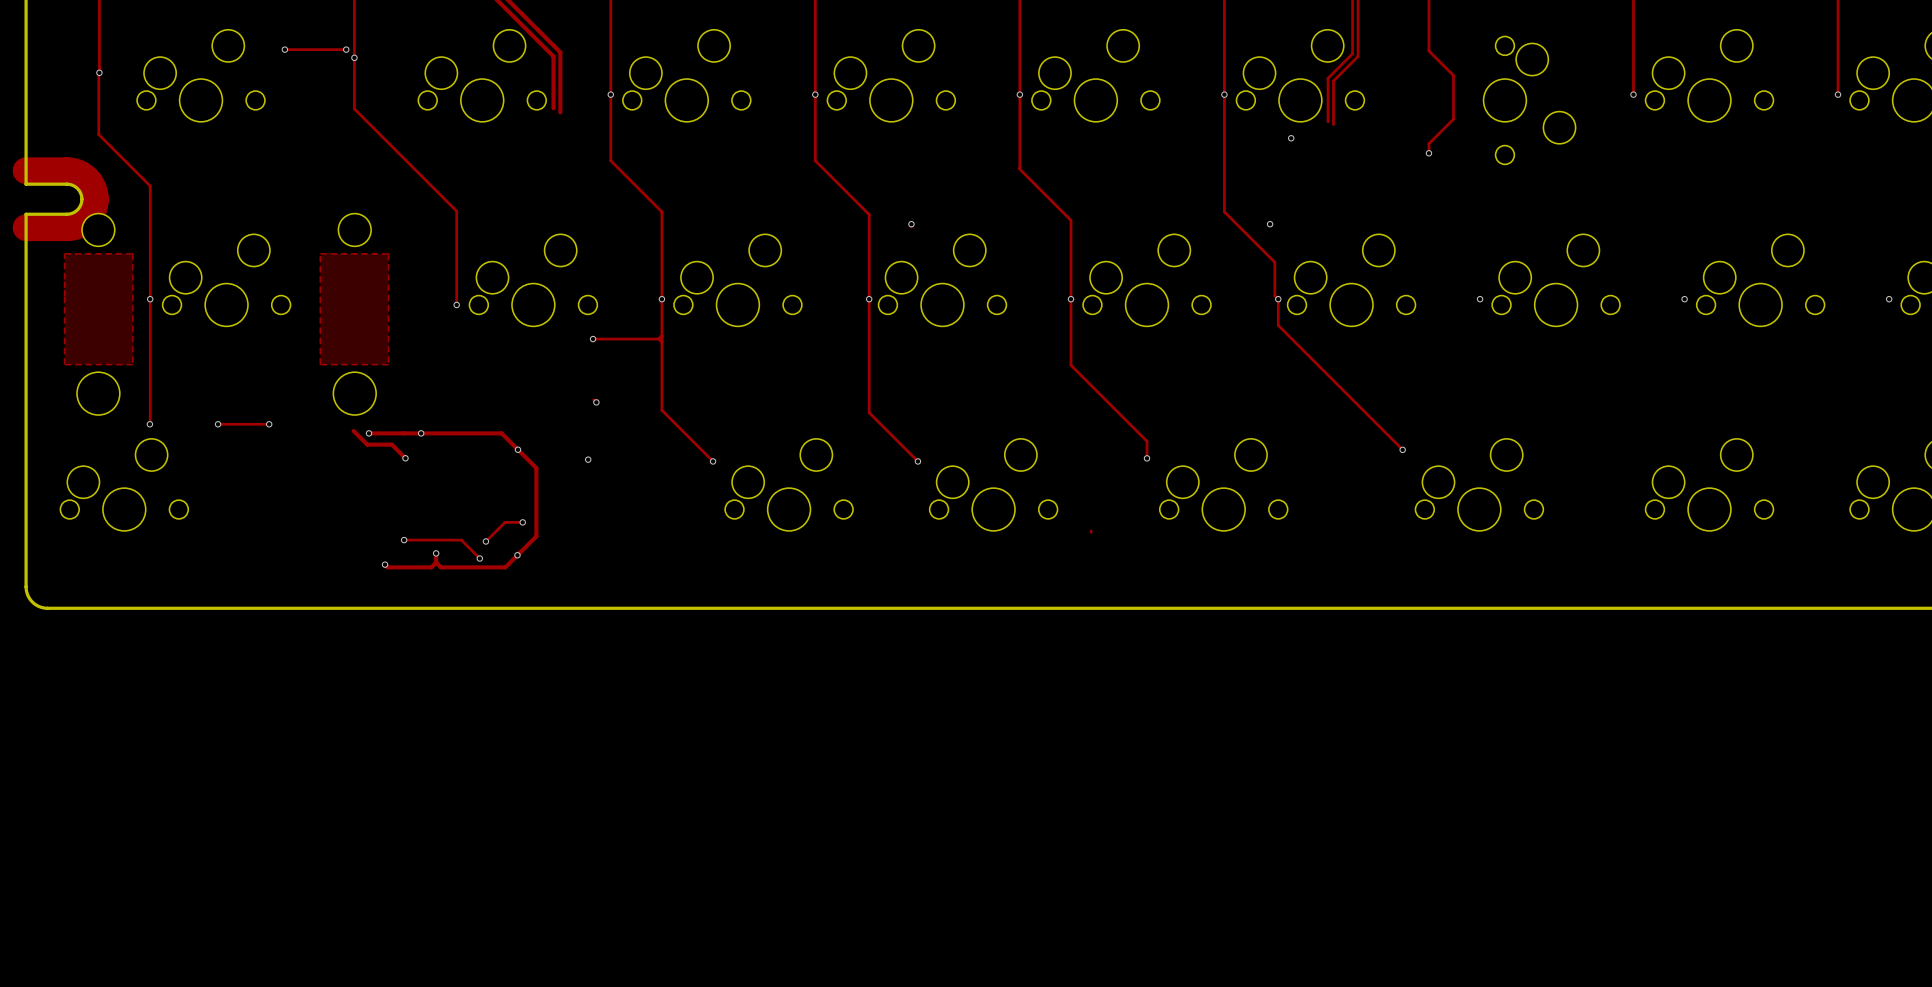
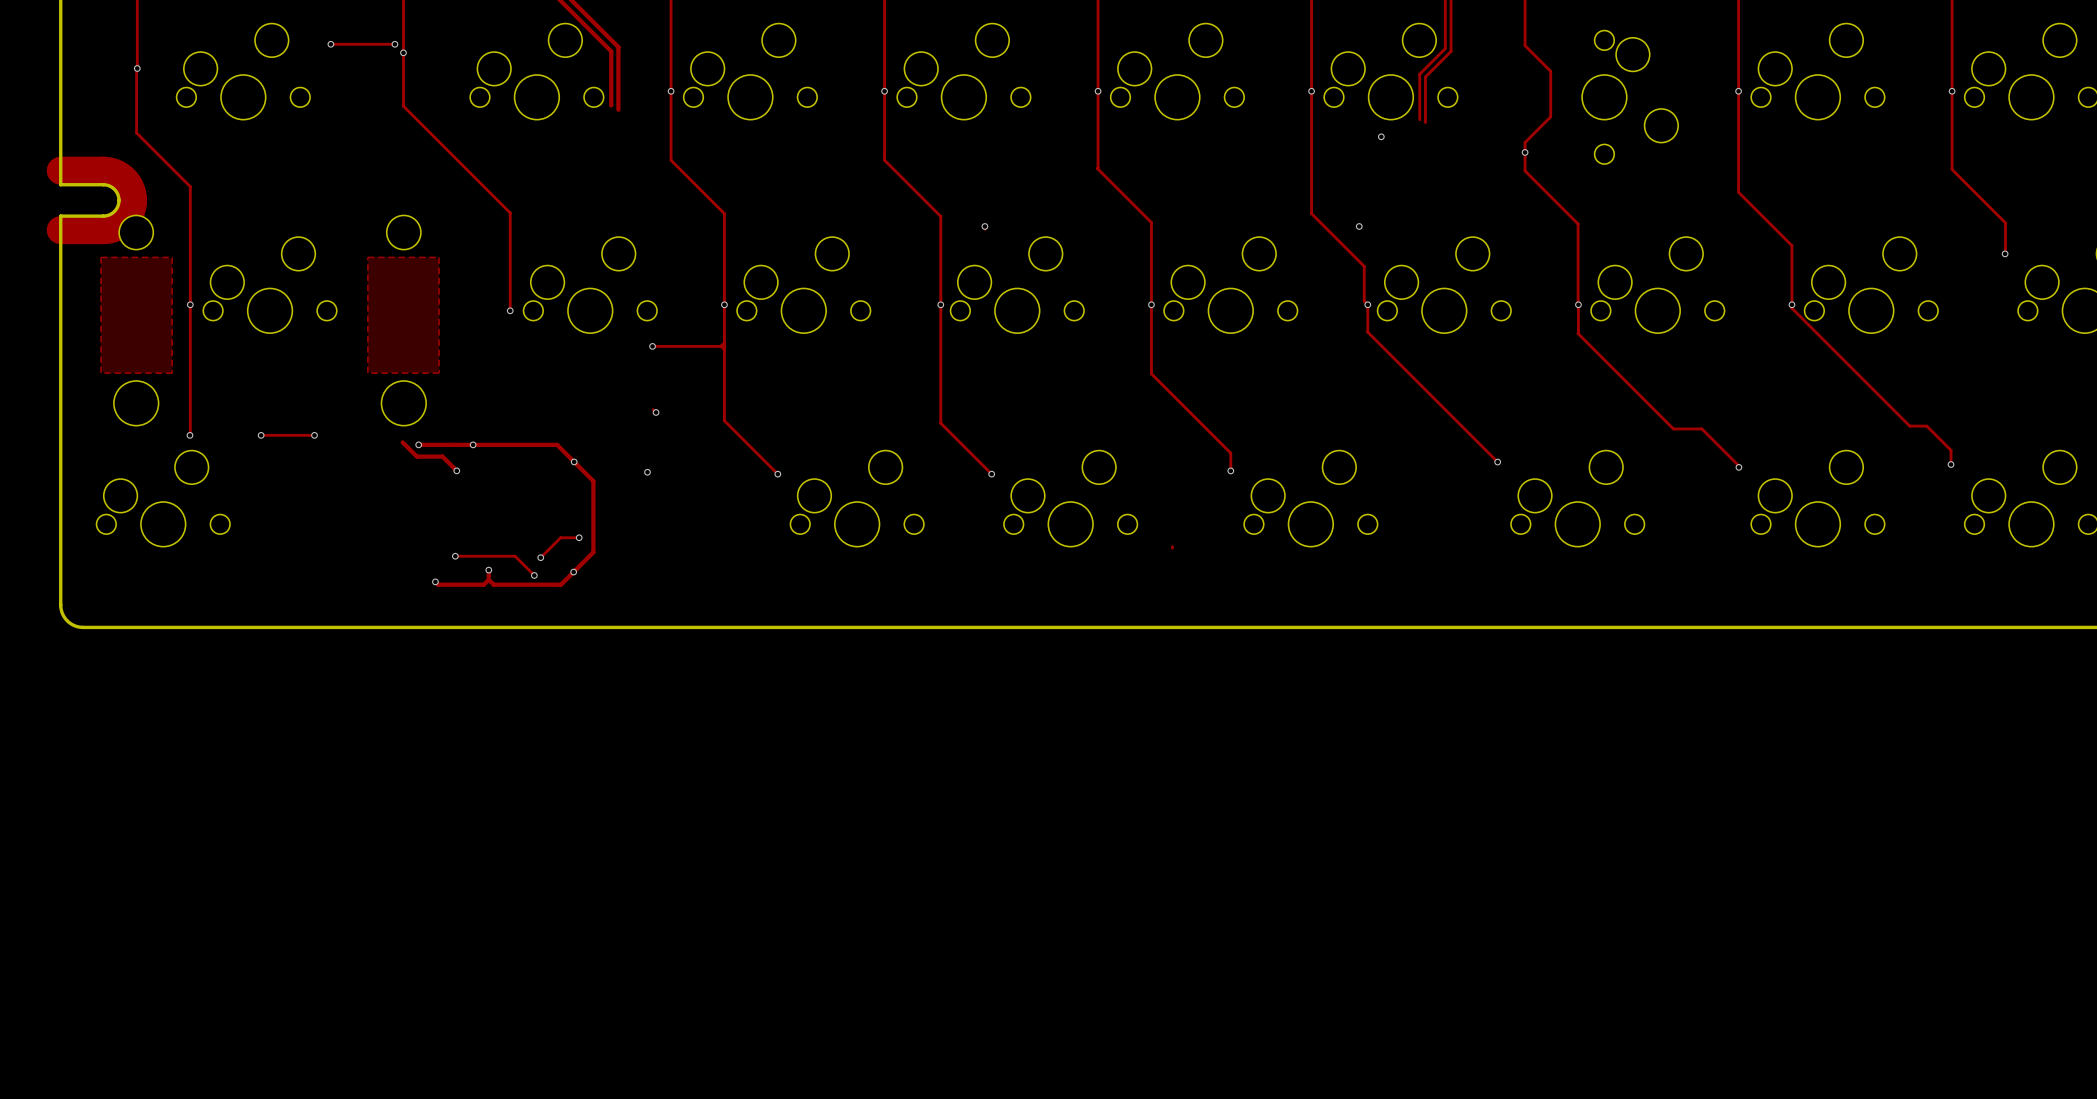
track: none -> (1738, 91) (1738, 192) (1791, 245) (1791, 308) (1909, 426) (1926, 426) (1951, 450) (1951, 464)
track: none -> (1952, 91) (1952, 169) (2005, 222) (2005, 253)
track: none -> (1525, 152) (1525, 170) (1578, 223) (1578, 333) (1673, 428) (1701, 428) (1738, 467)
via position: (1889, 299) -> (2005, 253)
via: none -> (1951, 464)
via: none -> (1738, 467)

